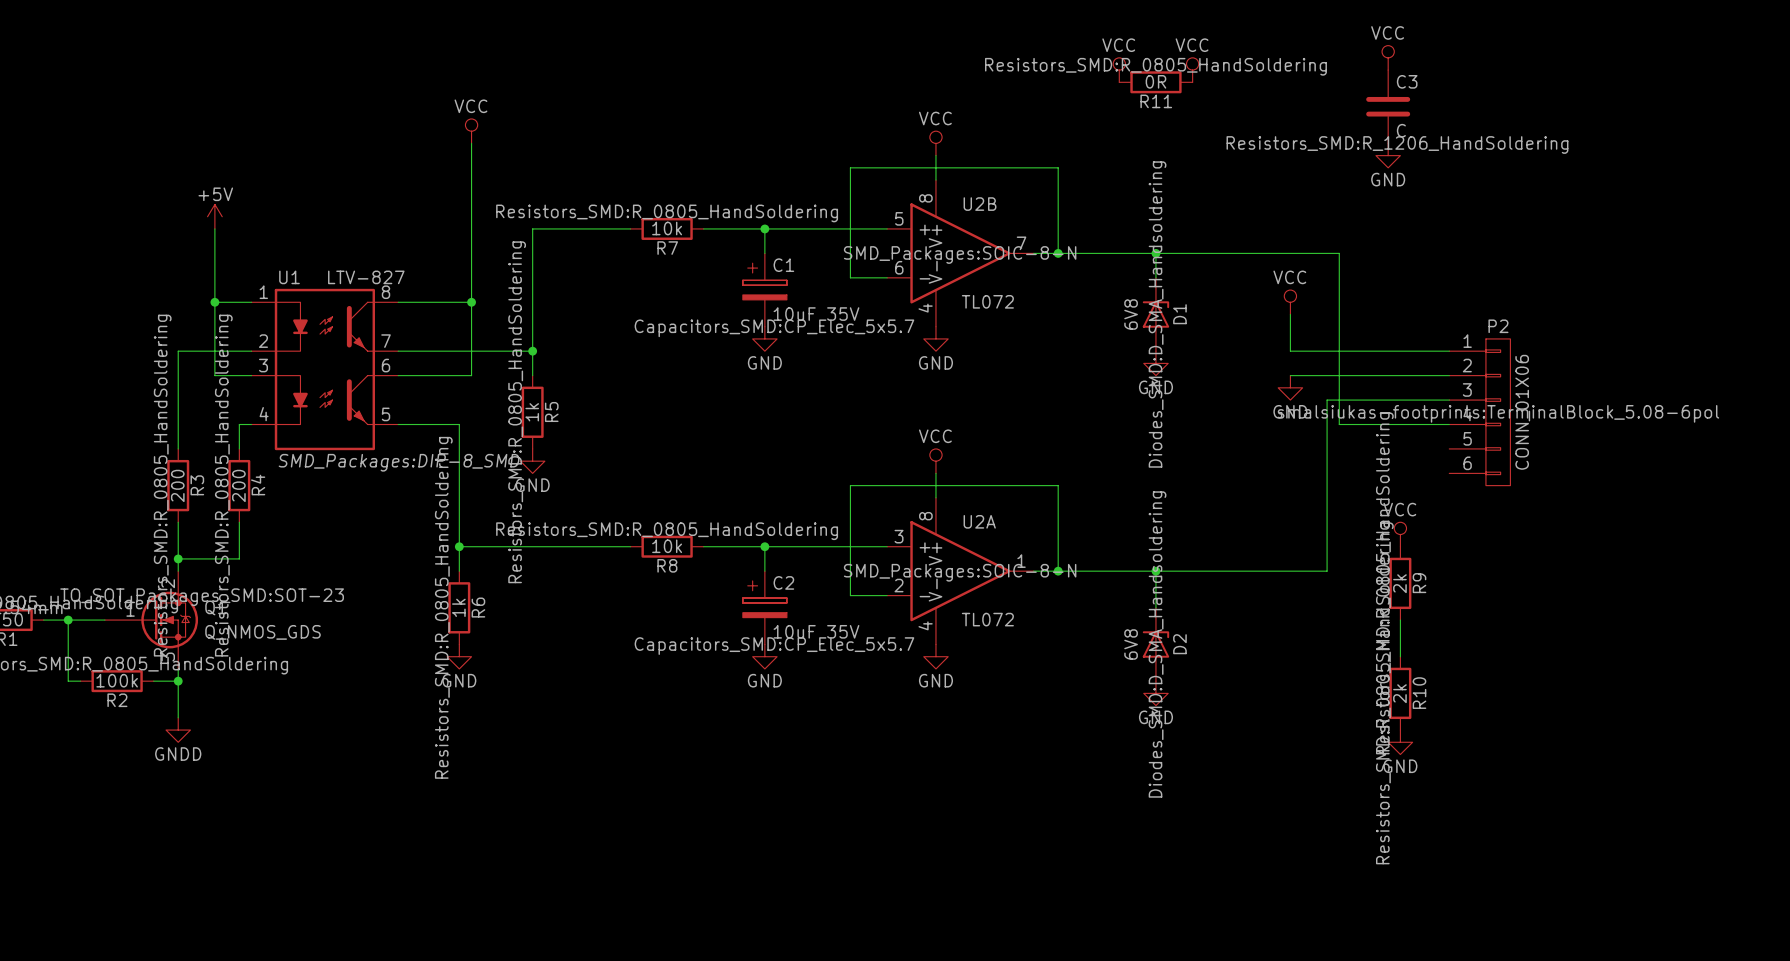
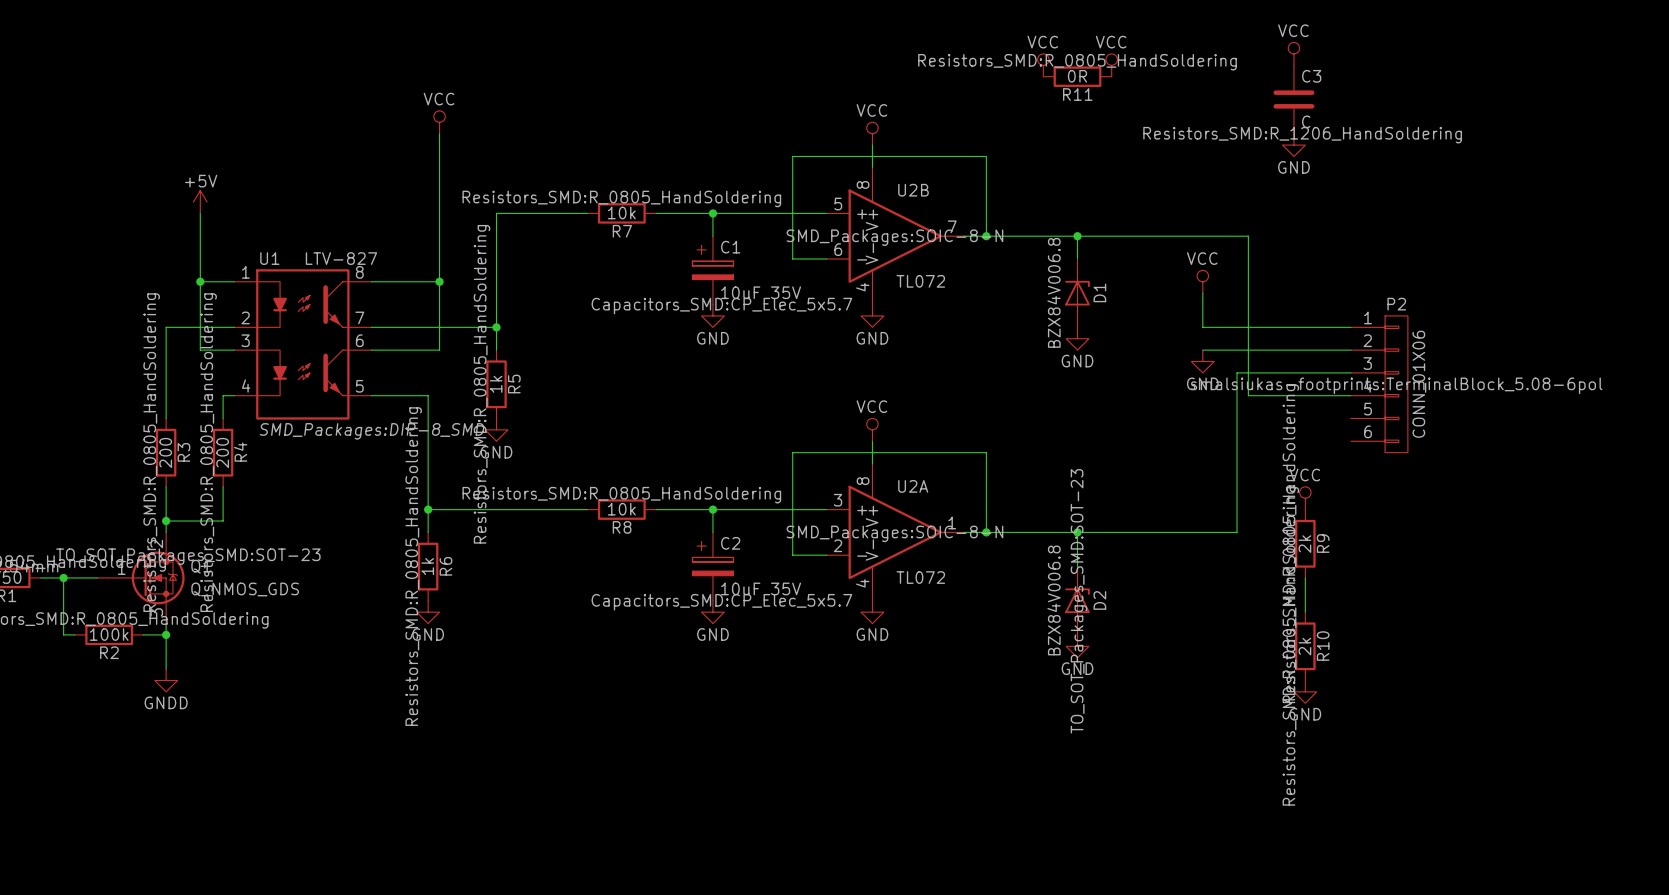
D1 value: 6V8 (1131, 314) -> BZX84V006.8 (1054, 292)
D1 text: Diodes_SMD:D_SMA_Handsoldering (1157, 314) -> none
D2 value: 6V8 (1131, 644) -> BZX84V006.8 (1054, 600)
D2 text: Diodes_SMD:D_SMA_Handsoldering (1157, 644) -> TO_SOT_Packages_SMD:SOT-23 (1078, 601)

